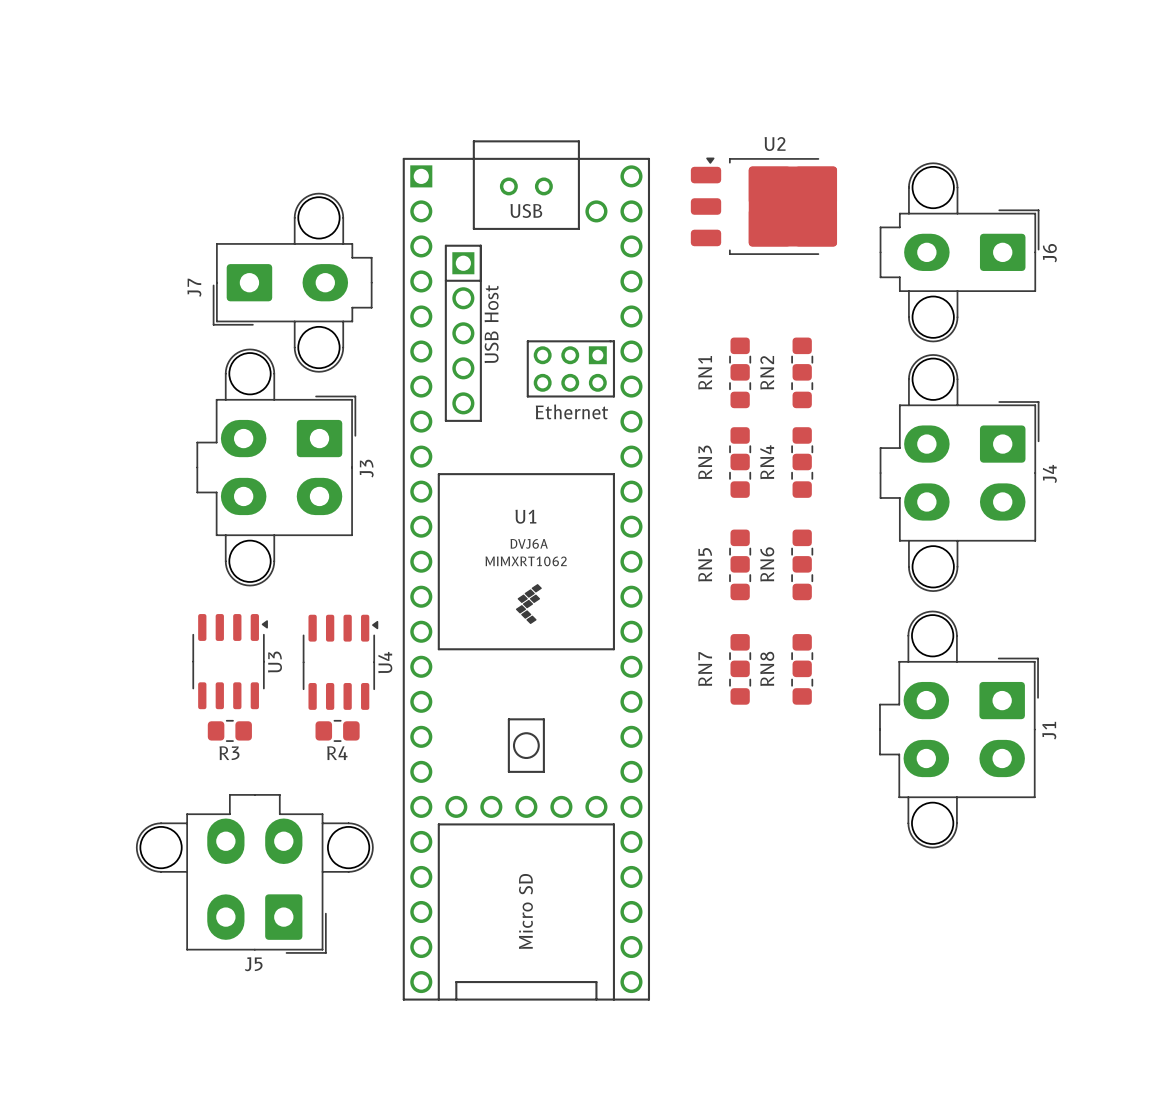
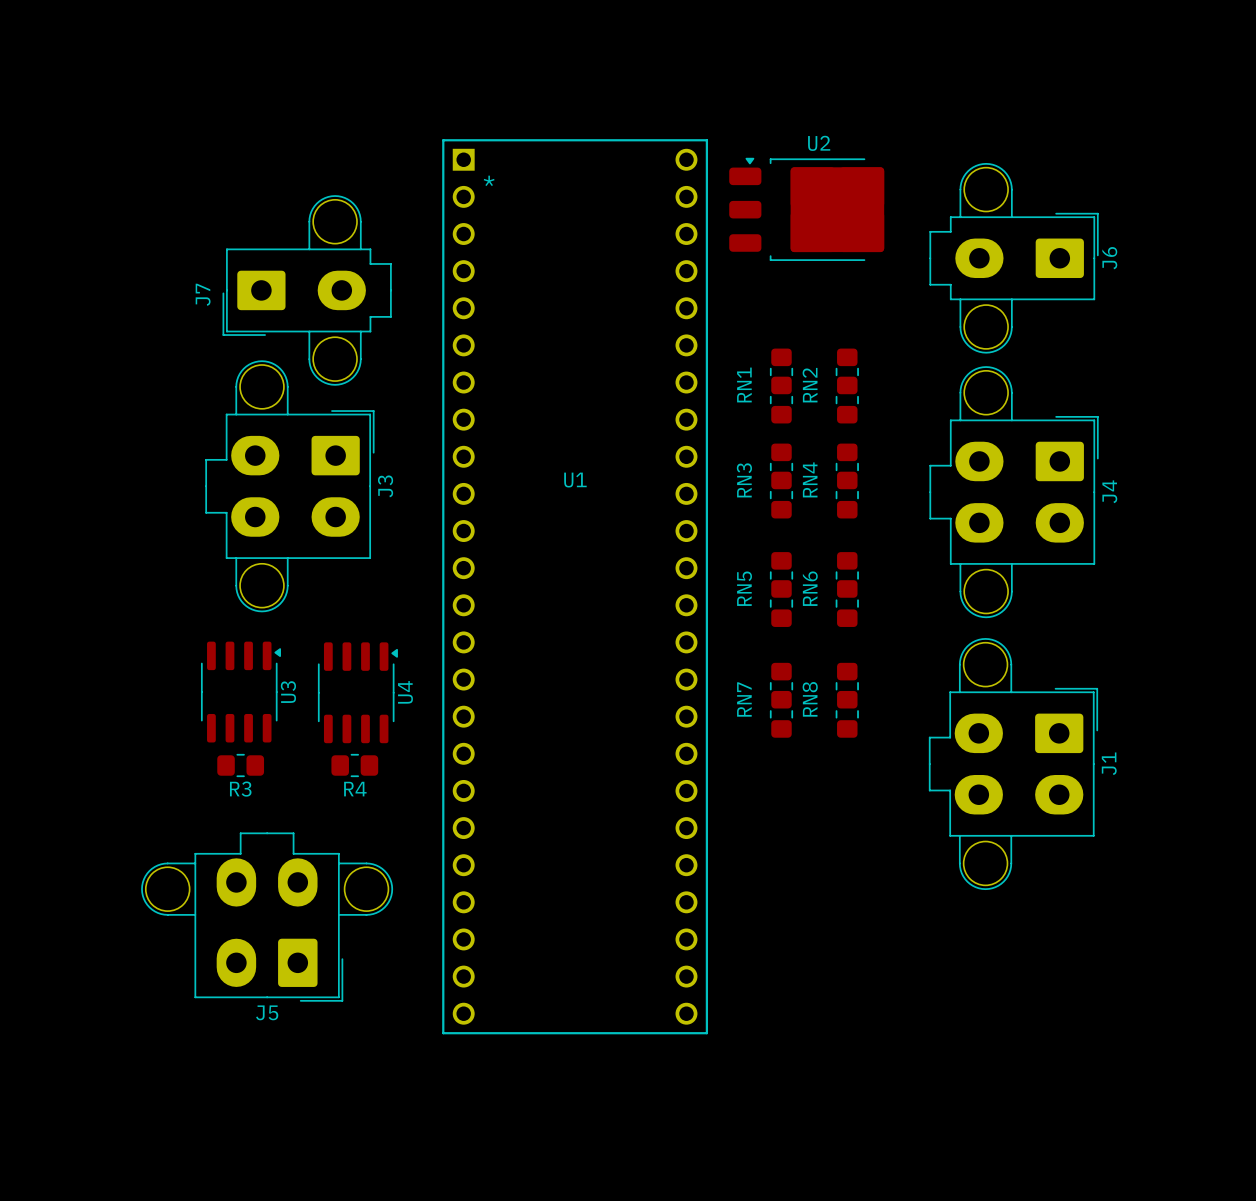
U1 footprint: [402, 140, 651, 1001] -> [442, 139, 709, 1035]
U1 name position: U1 (525, 516) -> U1 (575, 480)

